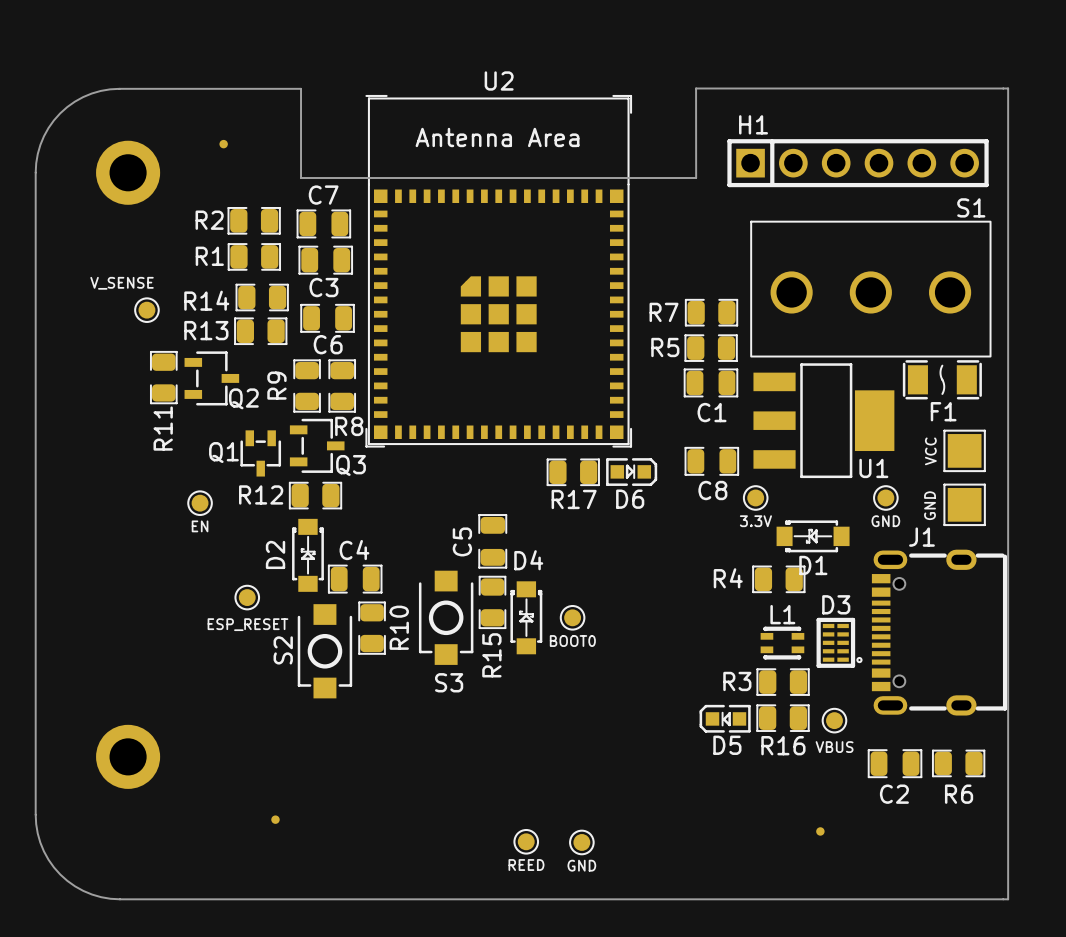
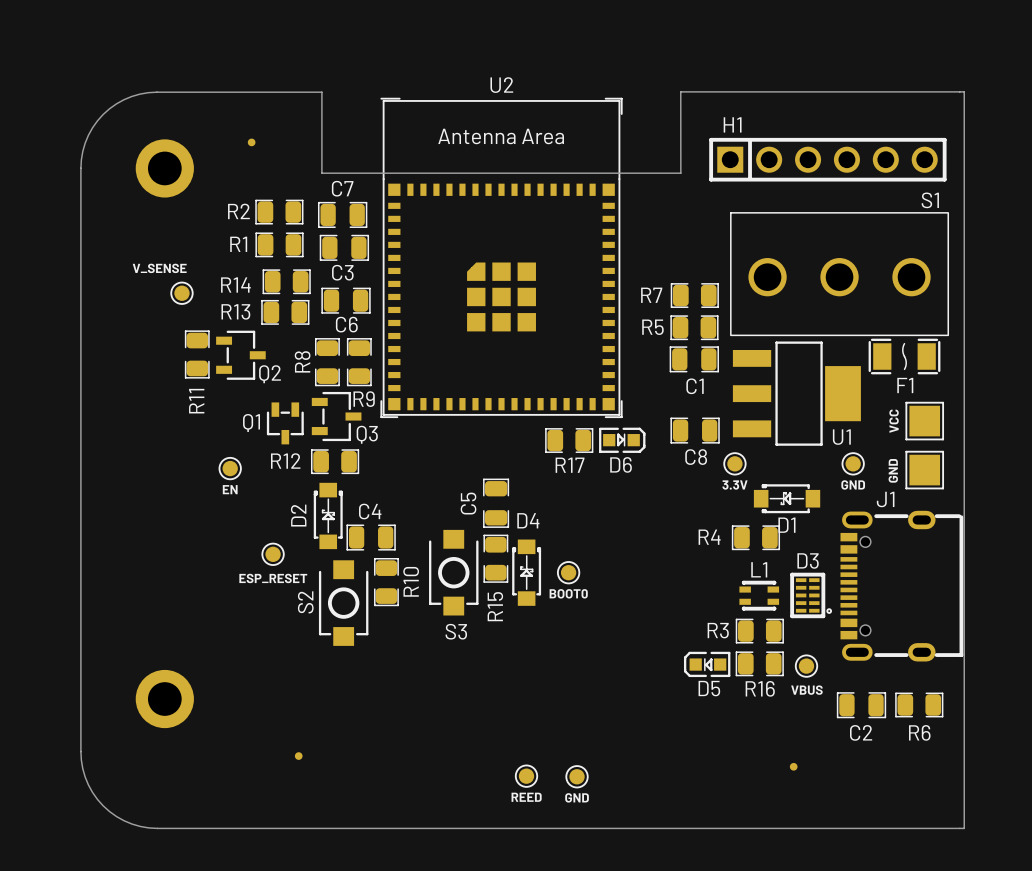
R9 name rotation: 0° (276, 385) -> 90° clockwise (364, 399)
R9 name position: R9 (276, 385) -> R9 (364, 399)
R8 name rotation: 0° (349, 426) -> 90° counterclockwise (302, 361)
R8 name position: R8 (349, 426) -> R8 (302, 361)

